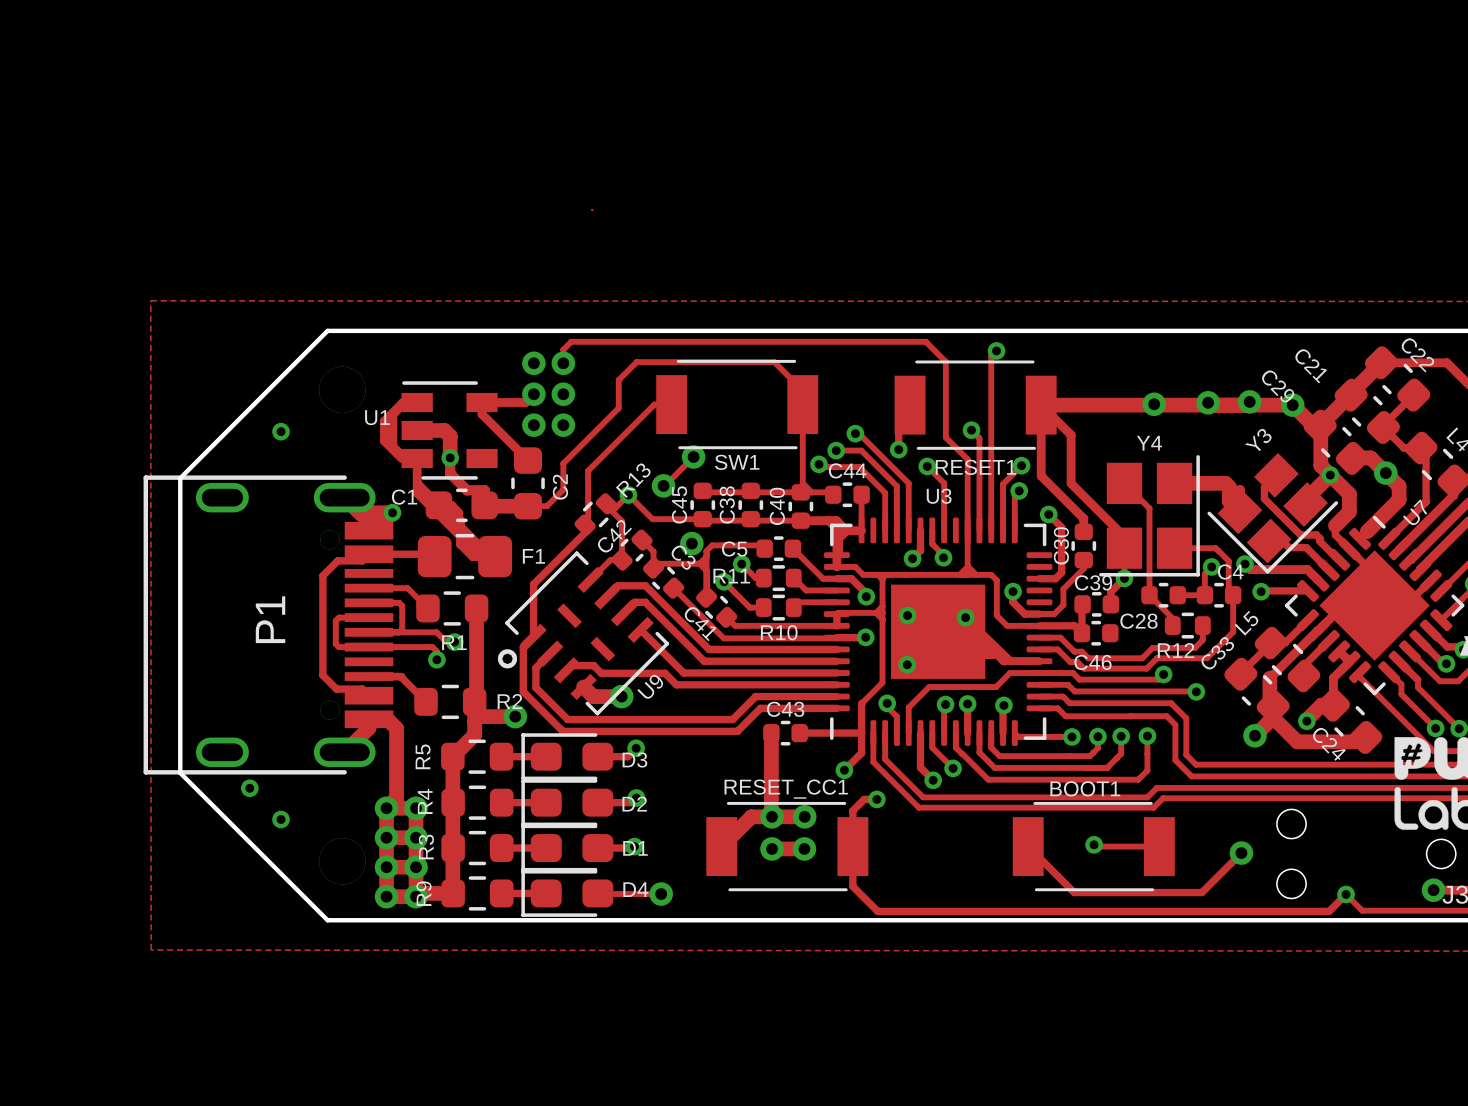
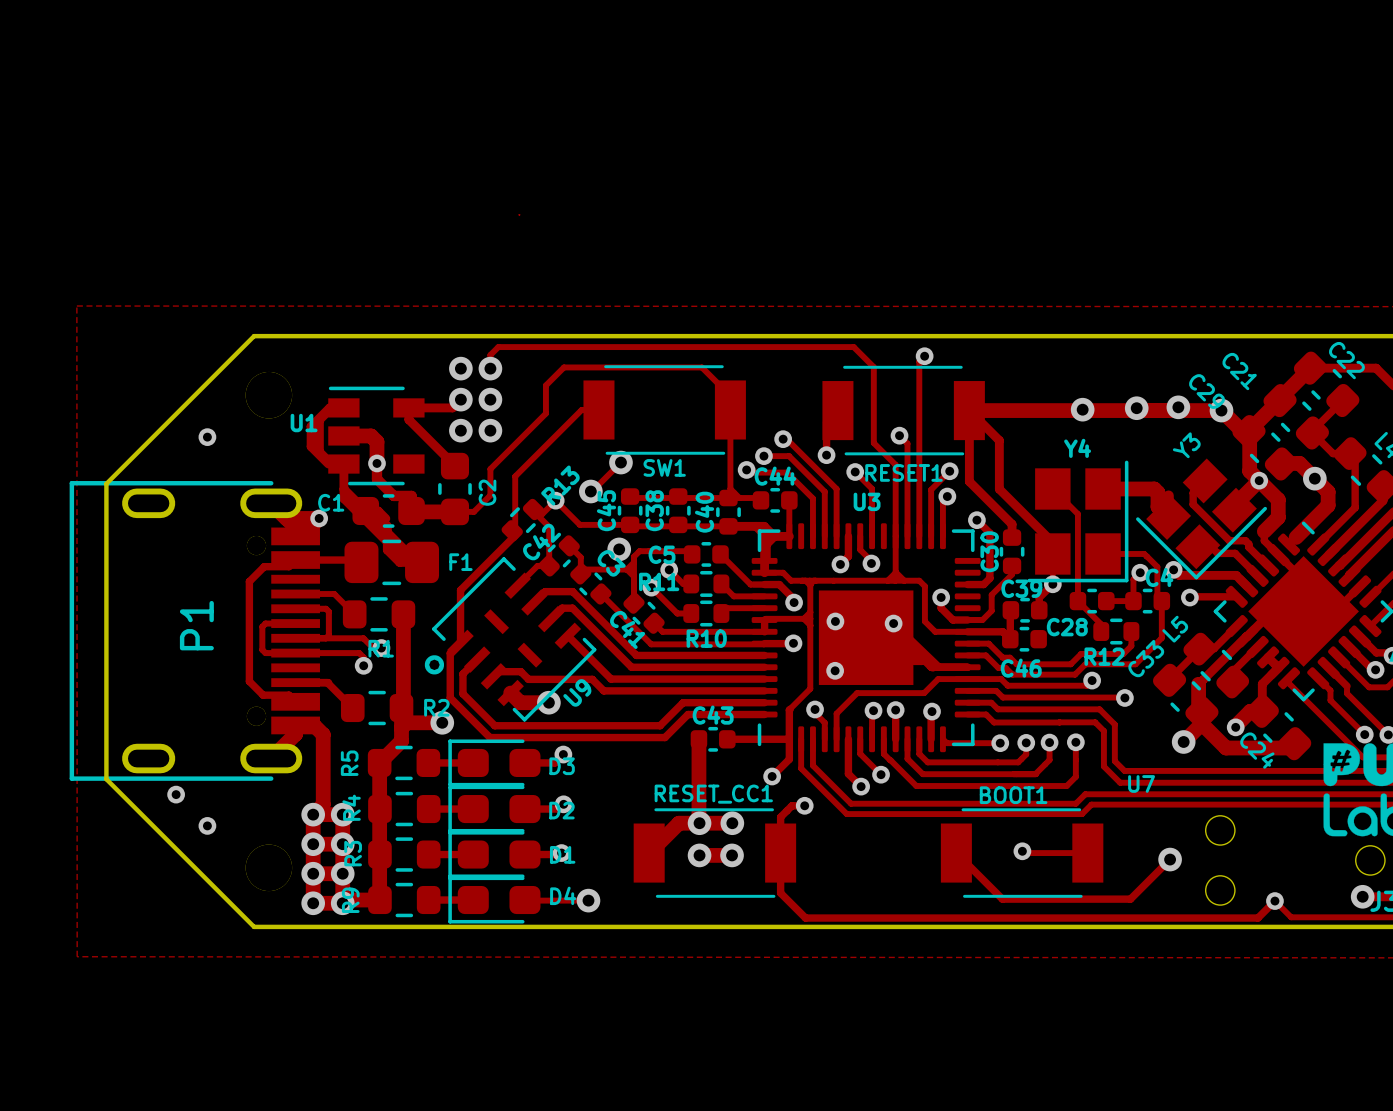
U7 name rotation: 0° (1415, 512) -> 45° clockwise (1141, 783)
U7 name position: U7 (1415, 512) -> U7 (1141, 783)

